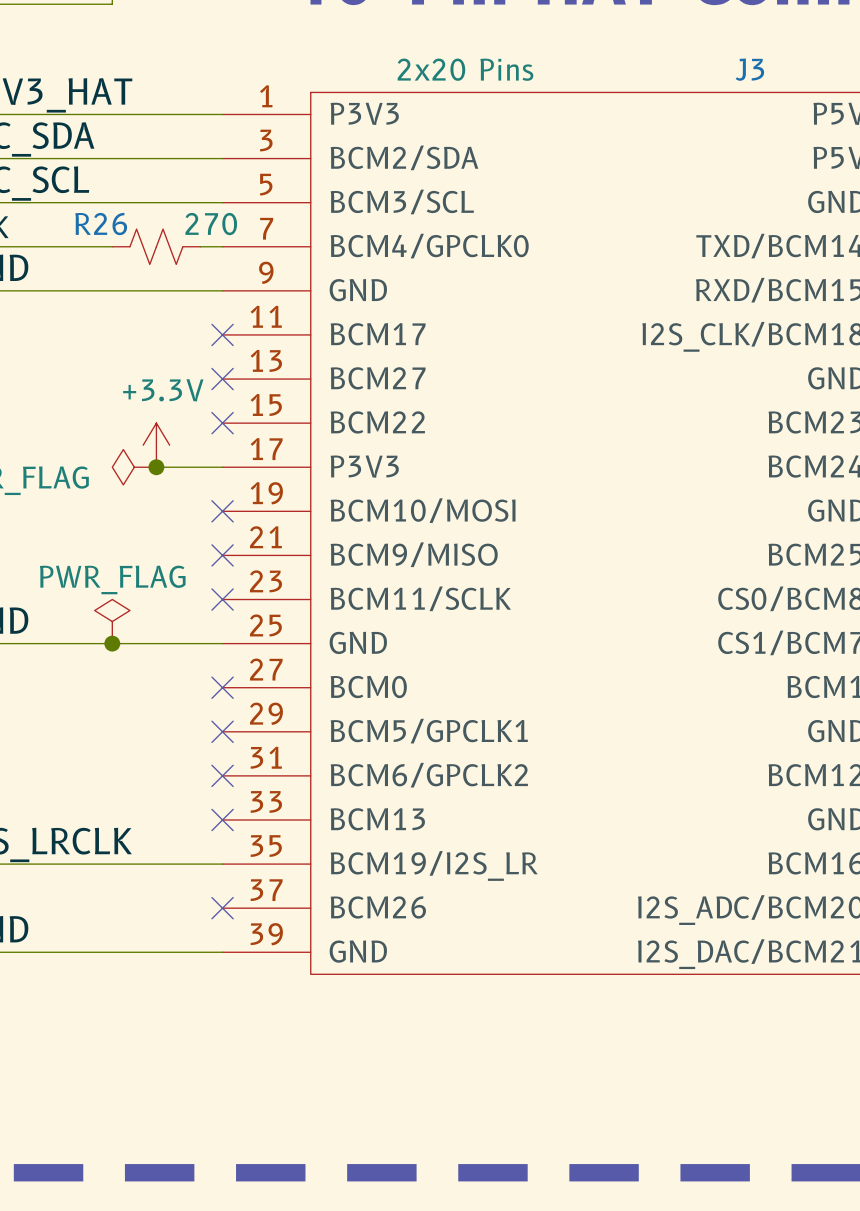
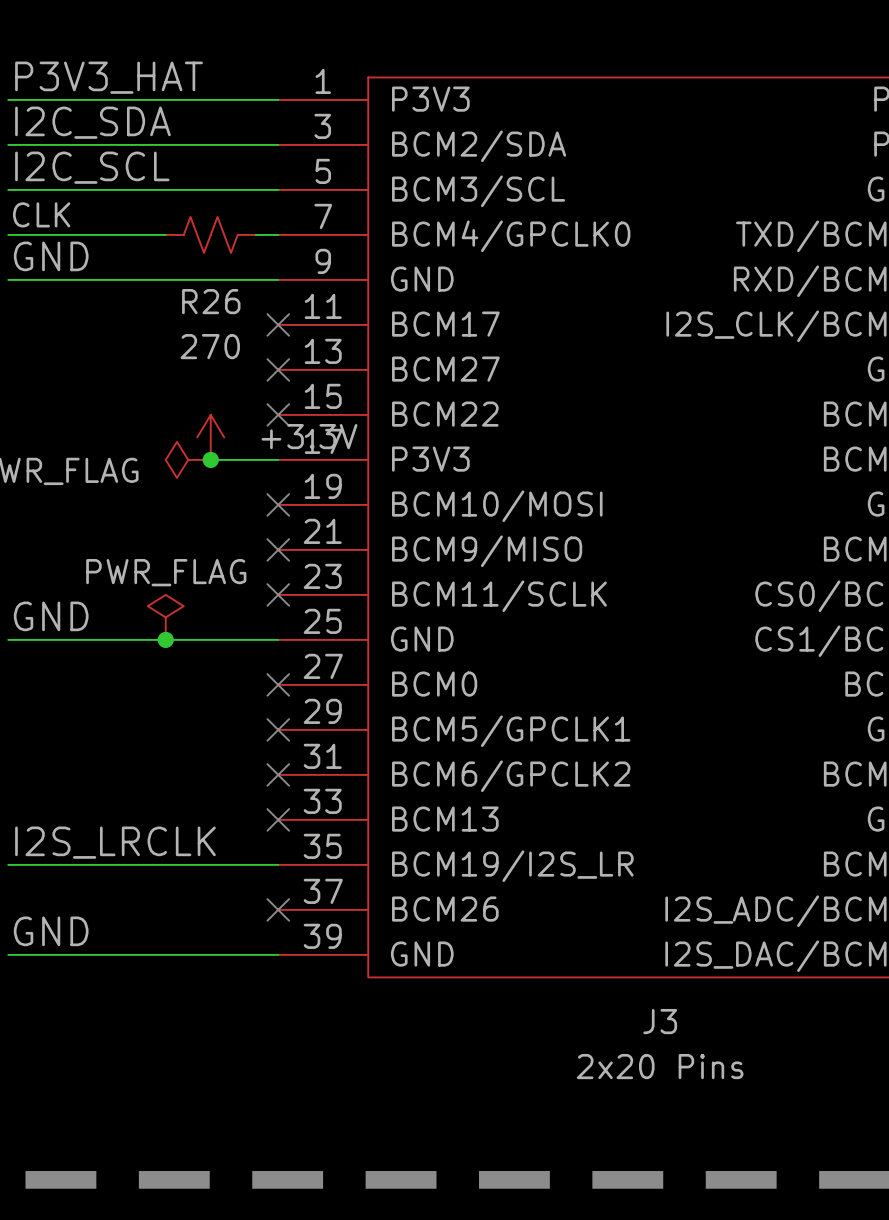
J3 value position: 2x20 Pins (465, 69) -> 2x20 Pins (660, 1066)
J3 name position: J3 (749, 69) -> J3 (660, 1021)
R26 name position: R26 (101, 224) -> R26 (211, 301)
R26 value position: 270 (211, 224) -> 270 (210, 346)
power symbol text position: +3.3V (163, 390) -> +3.3V (309, 436)

